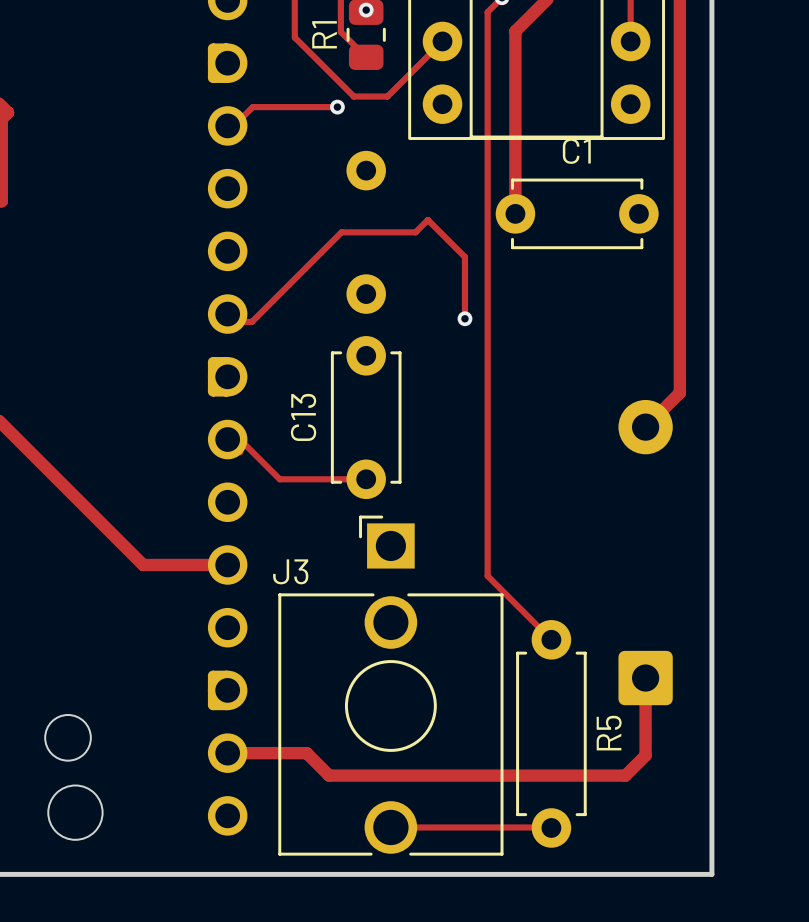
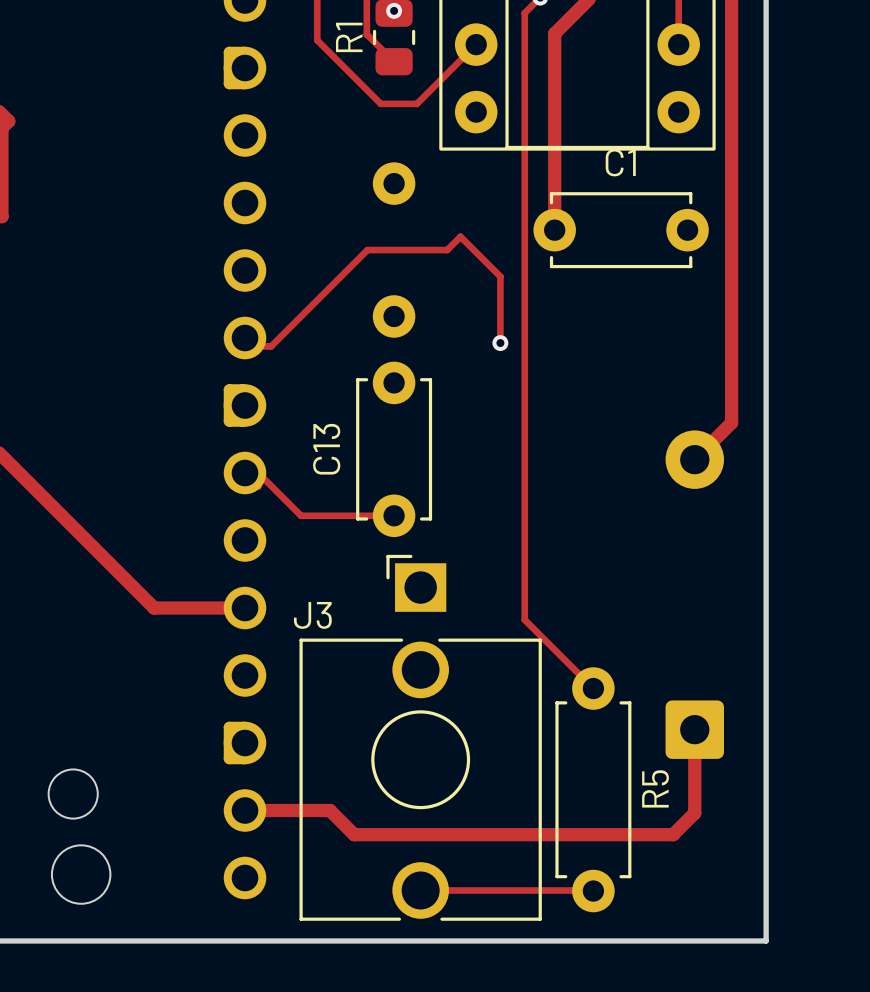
track: (337, 107) (252, 107) (243, 116) -> none
via: (337, 107) -> none

